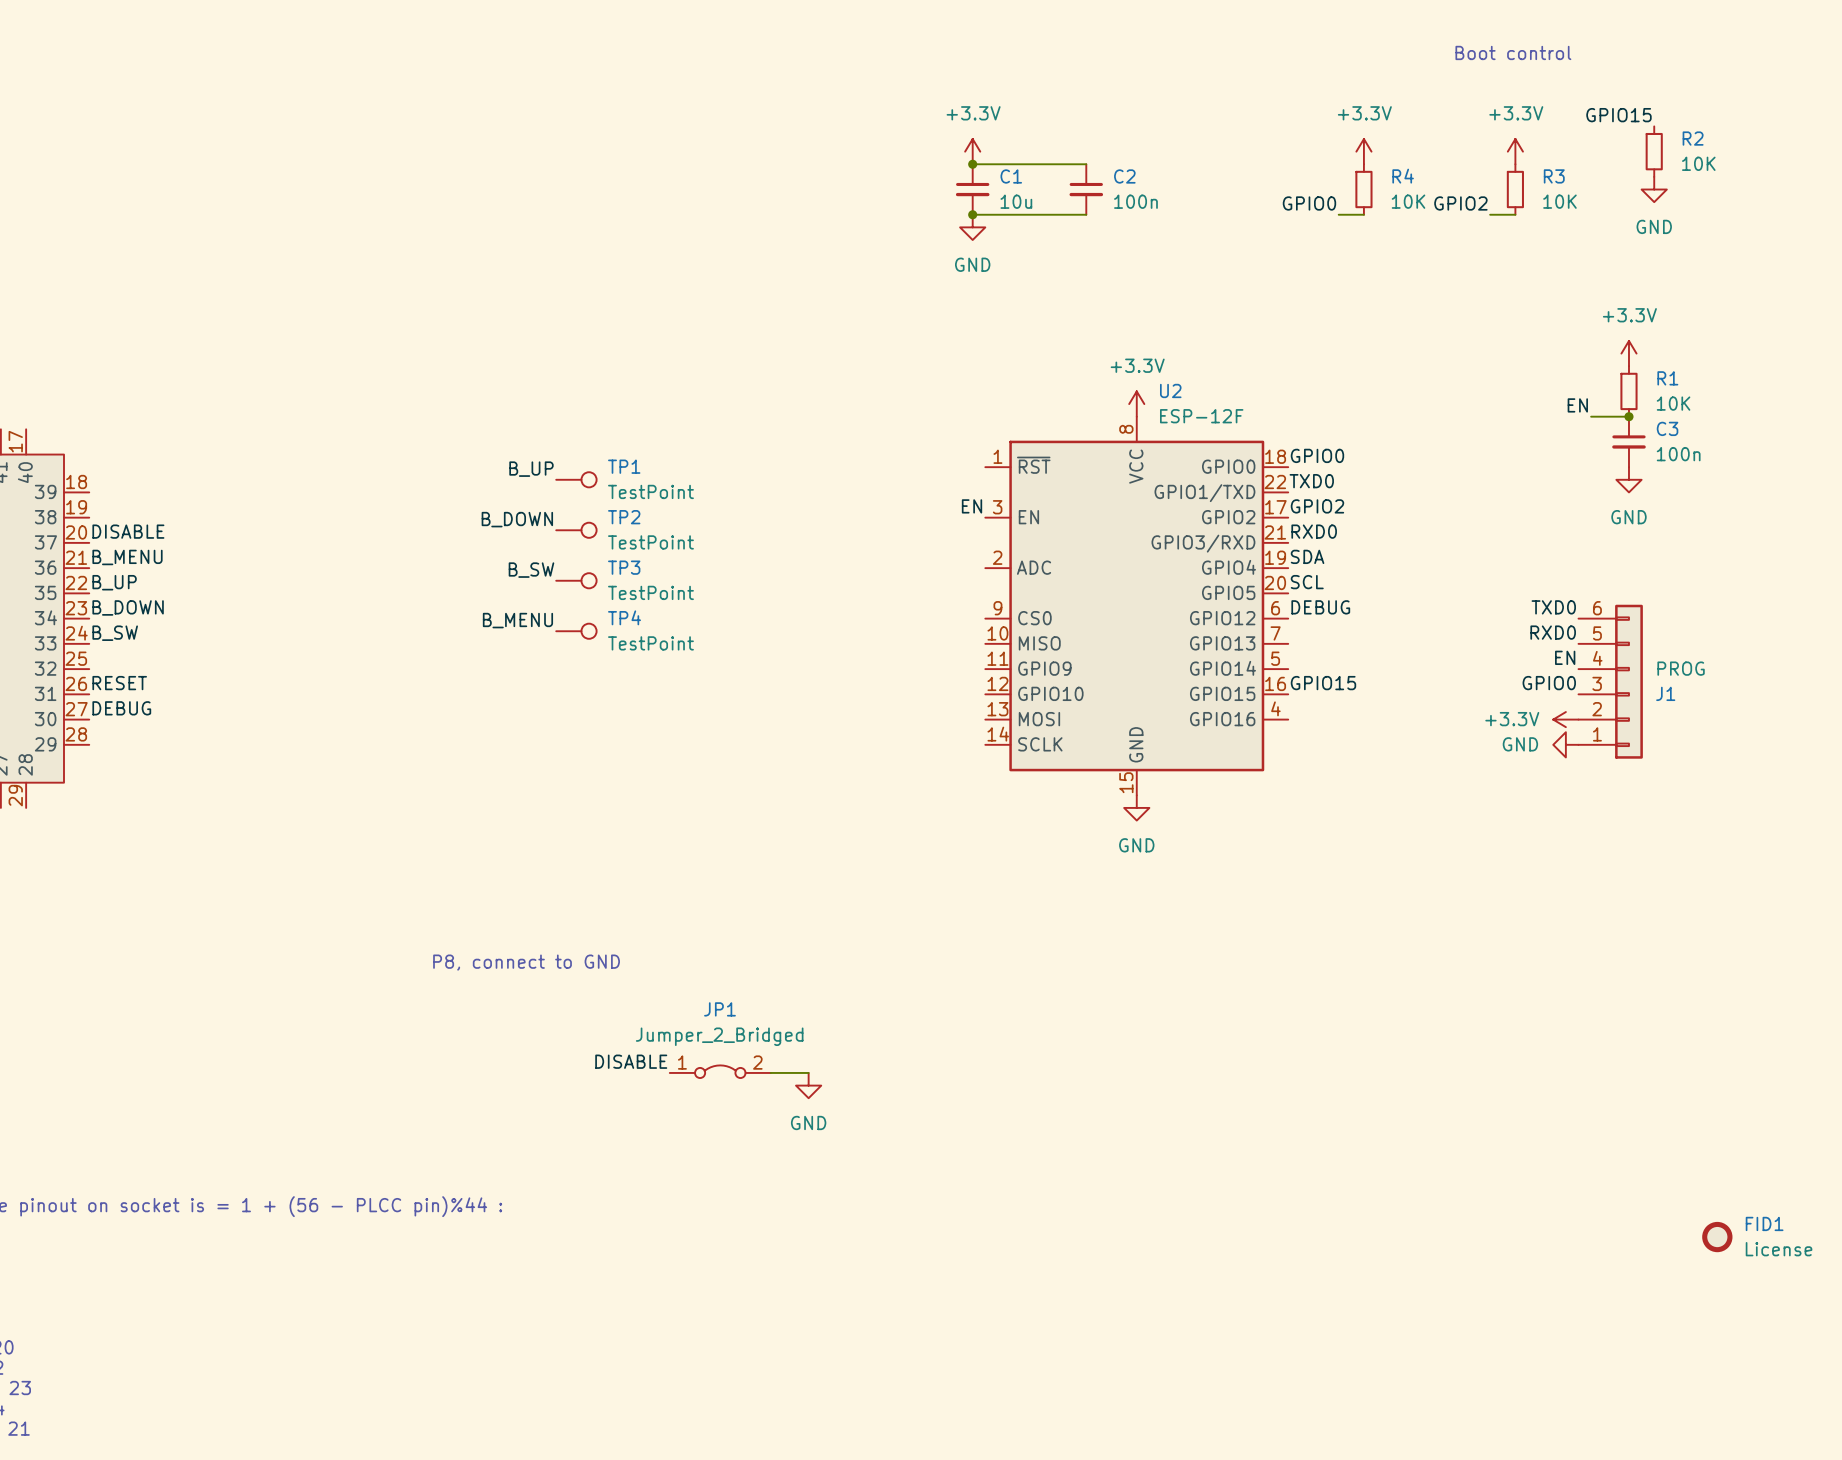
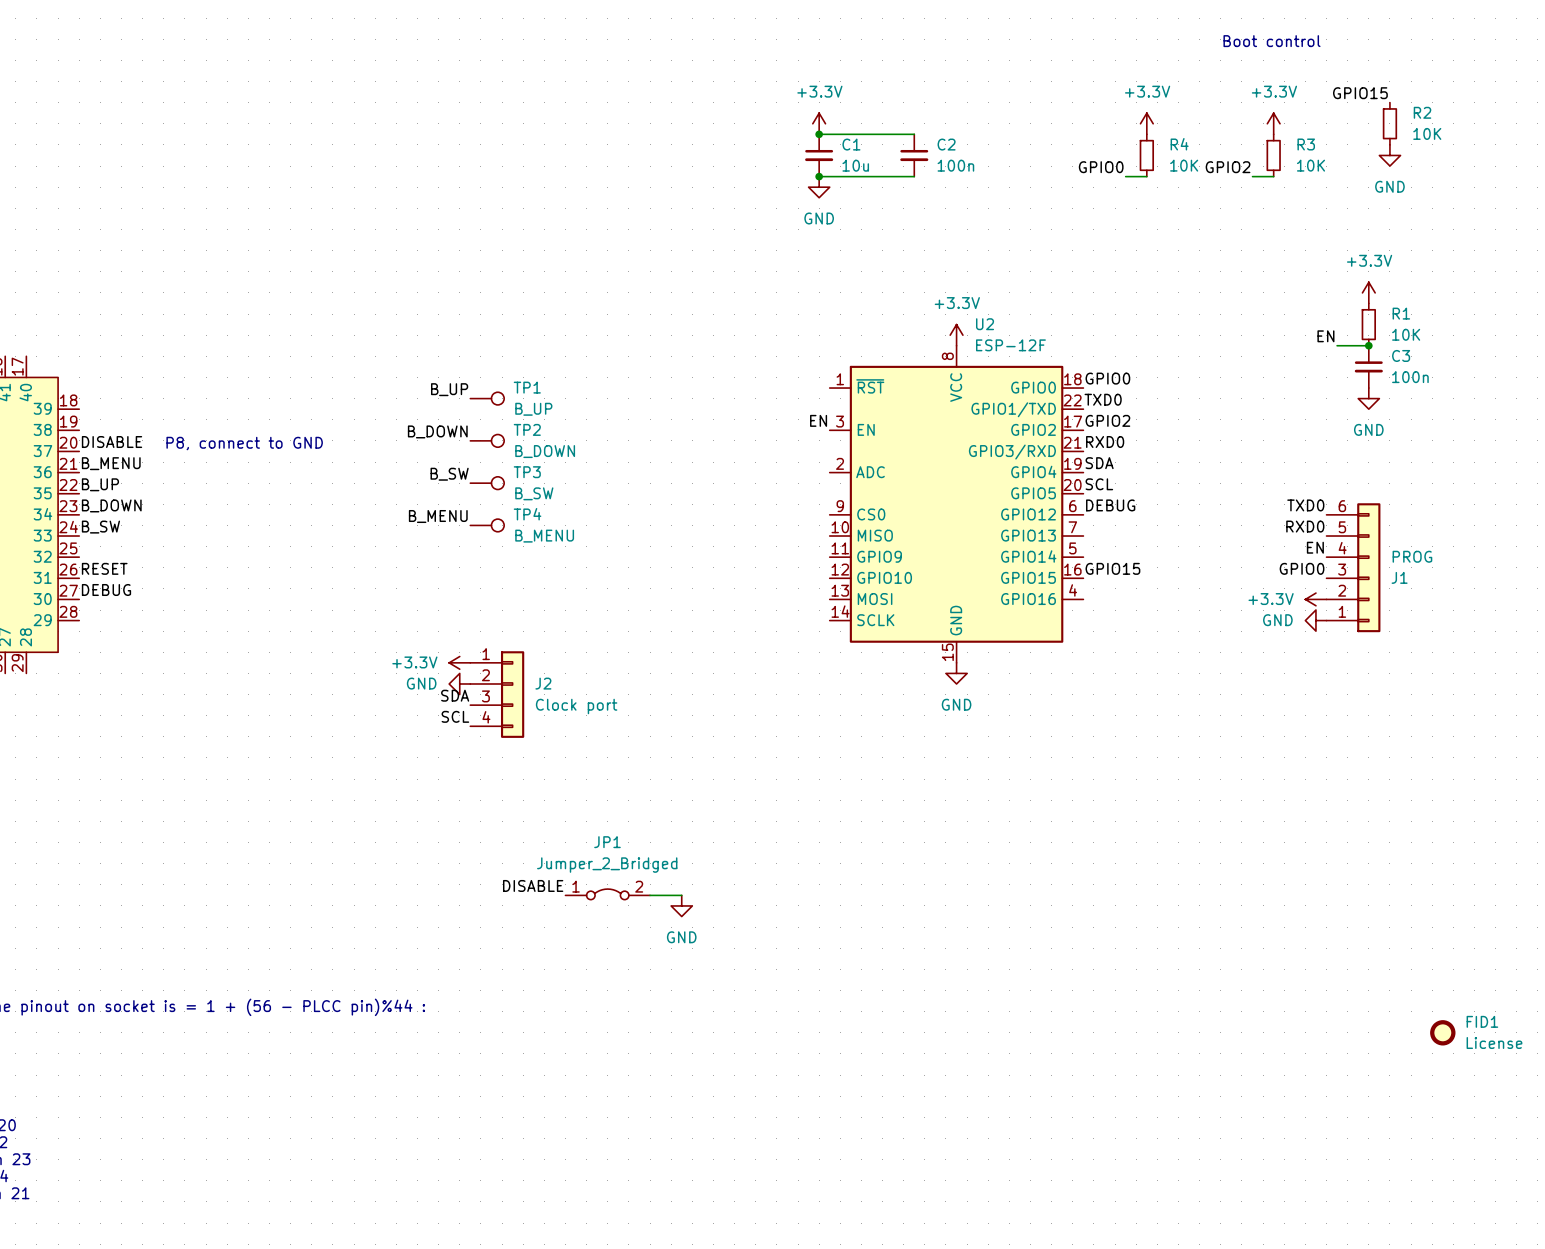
TP1 value: TestPoint (650, 491) -> B_UP (533, 409)
text: none -> P8, connect to GND (244, 443)
TP2 value: TestPoint (650, 542) -> B_DOWN (545, 451)
TP3 value: TestPoint (650, 592) -> B_SW (534, 493)
TP4 value: TestPoint (650, 643) -> B_MENU (544, 536)
power symbol: none -> +3.3V (459, 662)
power symbol: none -> GND (459, 683)
J2: none -> Clock port (497, 694)
label: none -> SDA (455, 695)
label: none -> SCL (455, 716)
text: P8, connect to GND (526, 962) -> none

